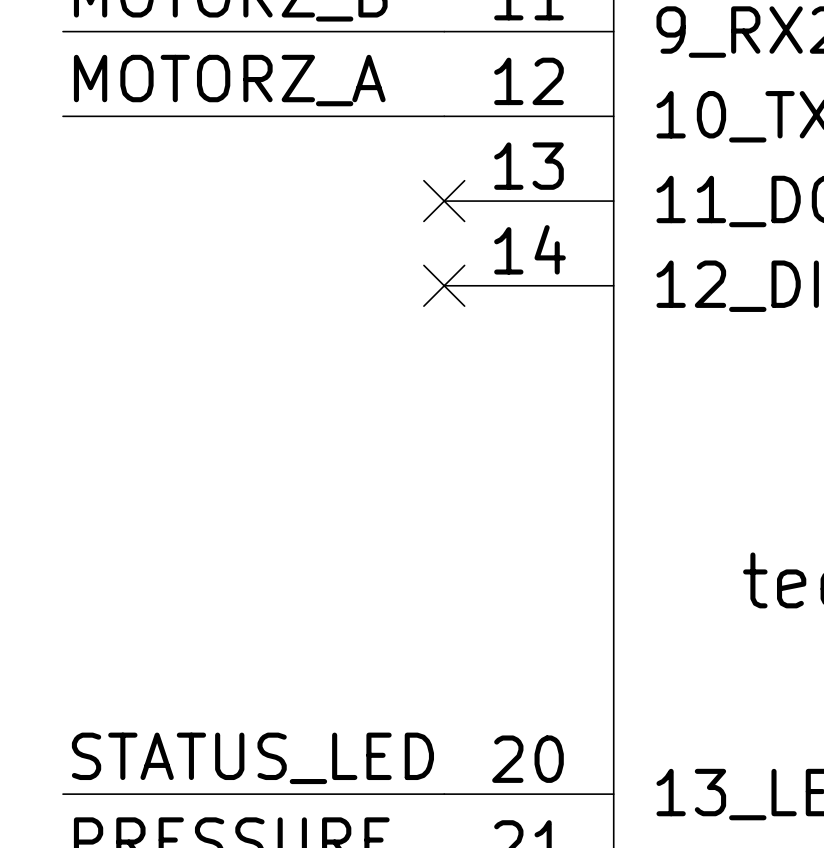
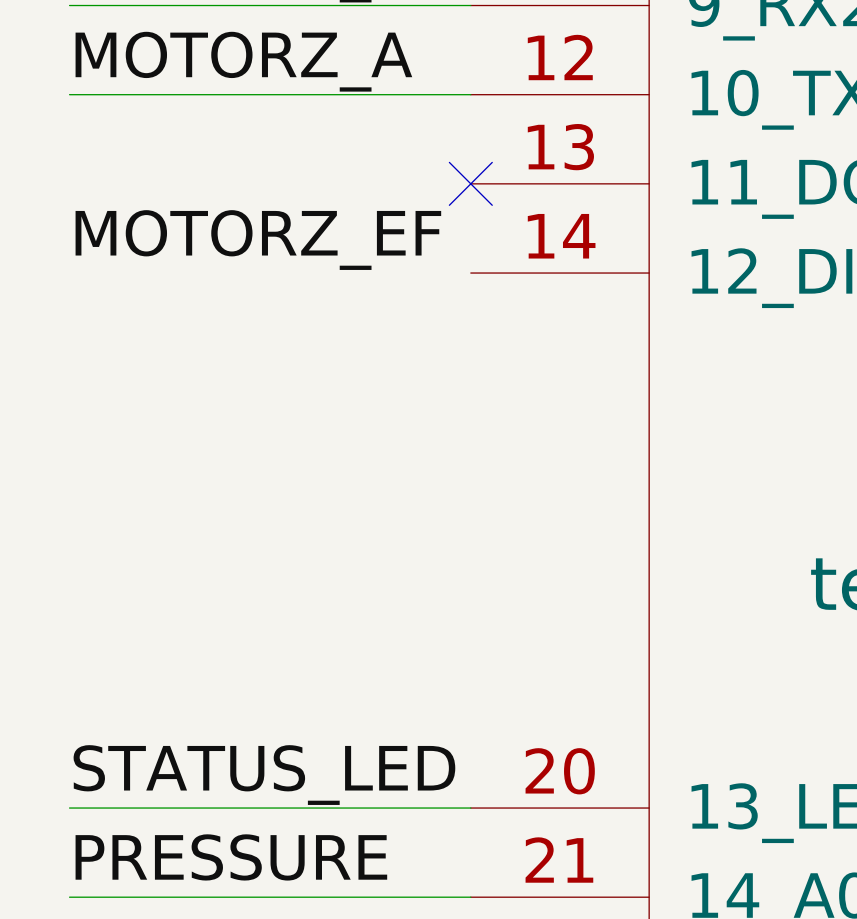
label: none -> MOTORZ_EF (258, 240)
no-connect mark: (444, 285) -> none

